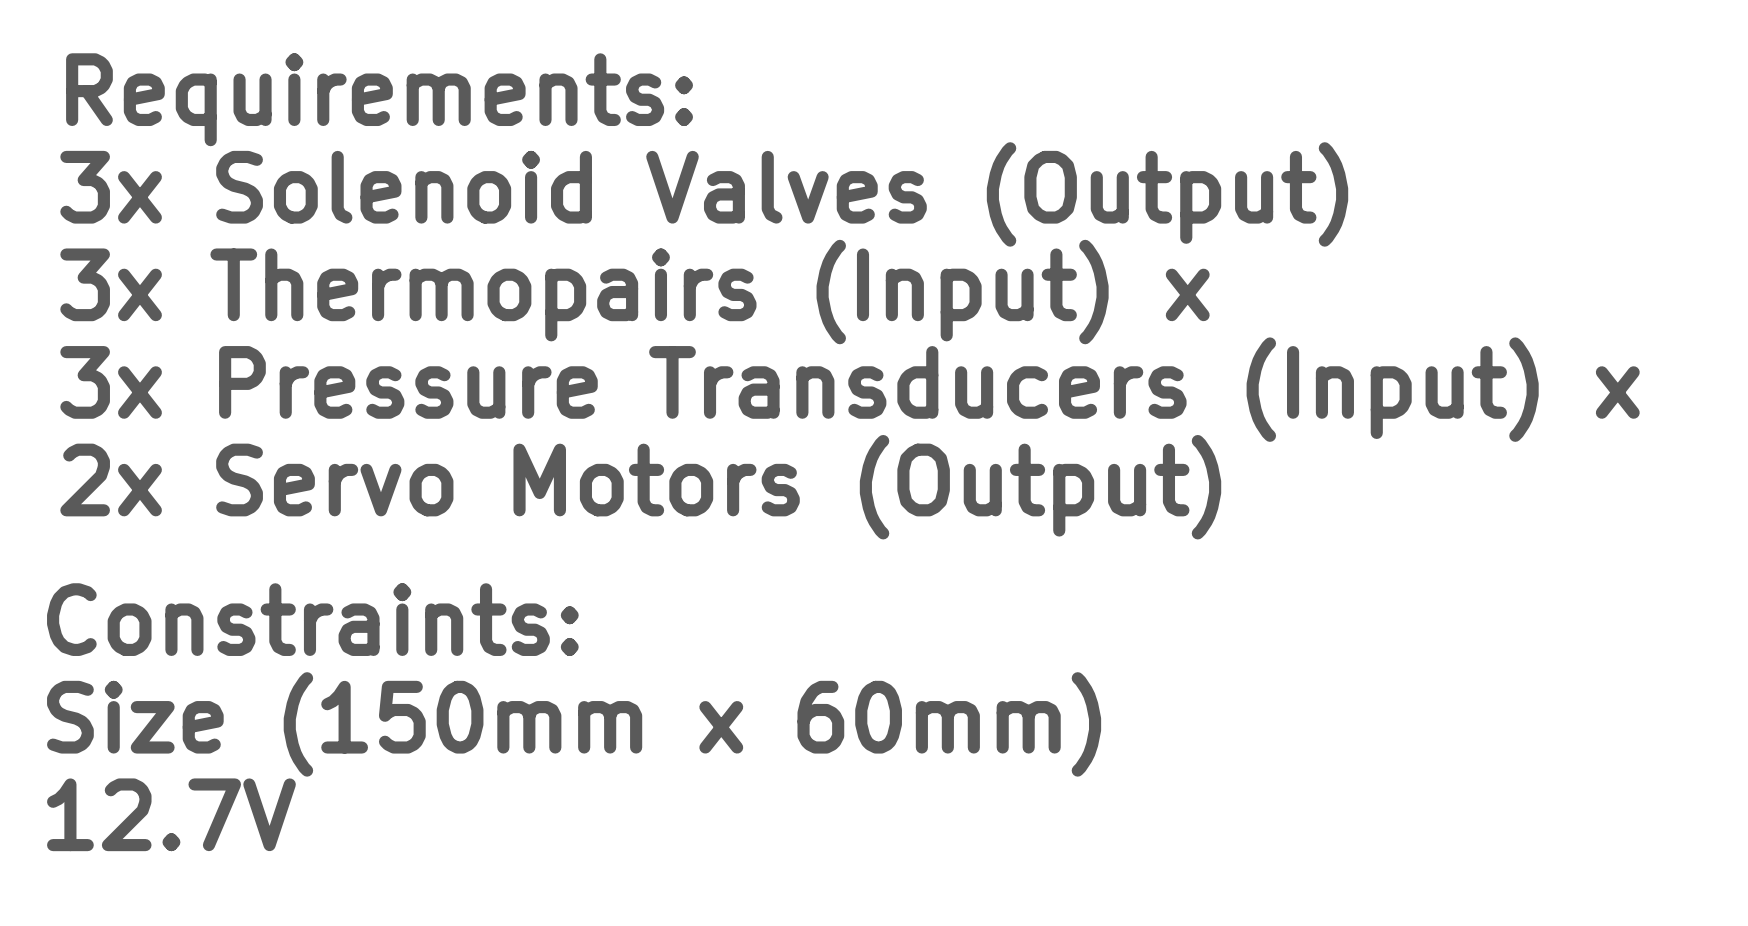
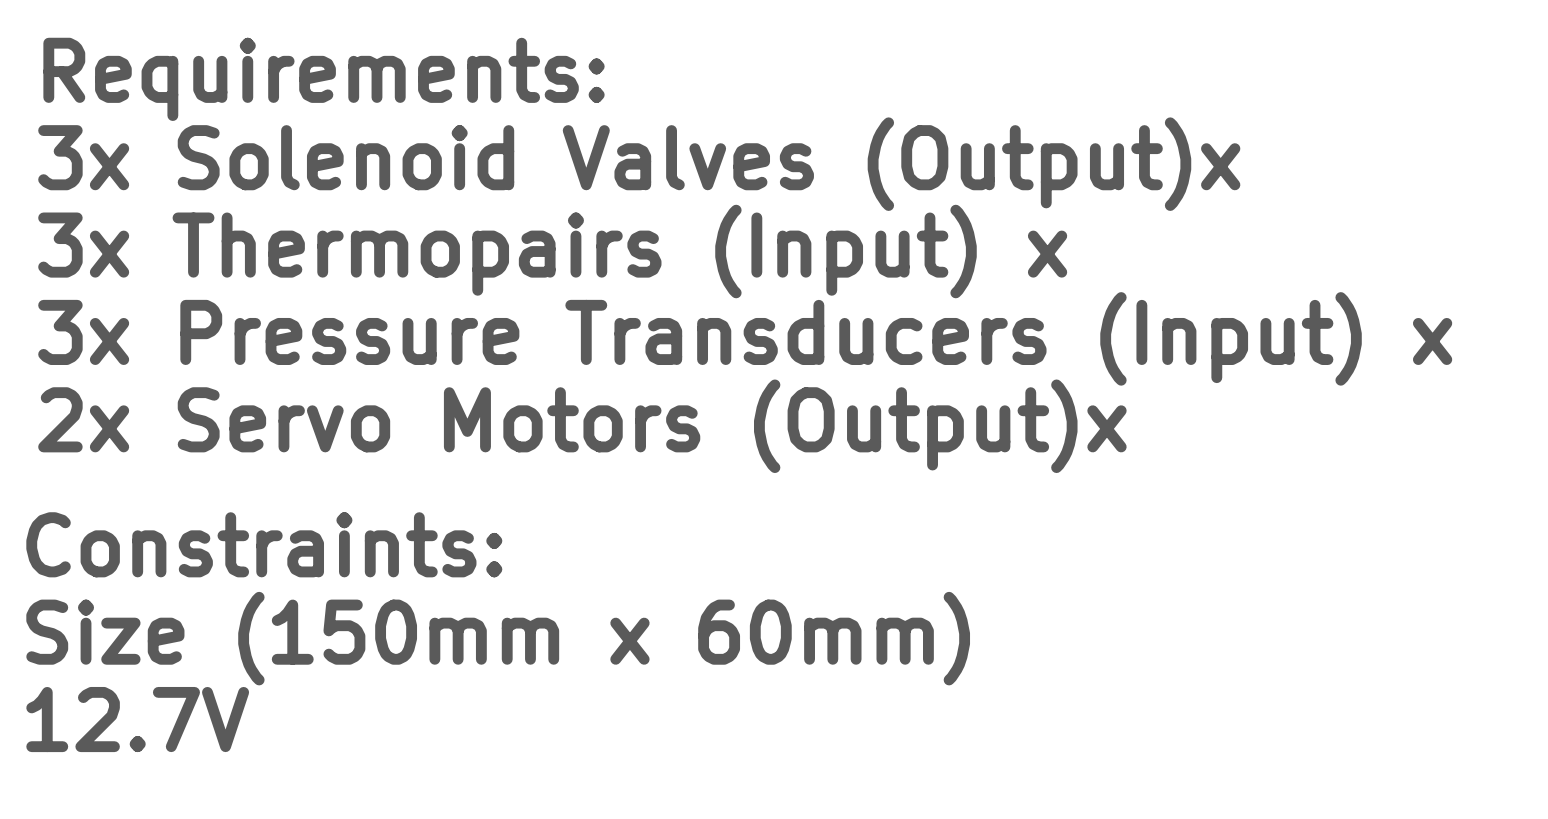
text: 3x Solenoid Valves (Output) (704, 194) -> 3x Solenoid Valves (Output)x (639, 164)
text: 2x Servo Motors (Output) (640, 487) -> 2x Servo Motors (Output)x (582, 426)

